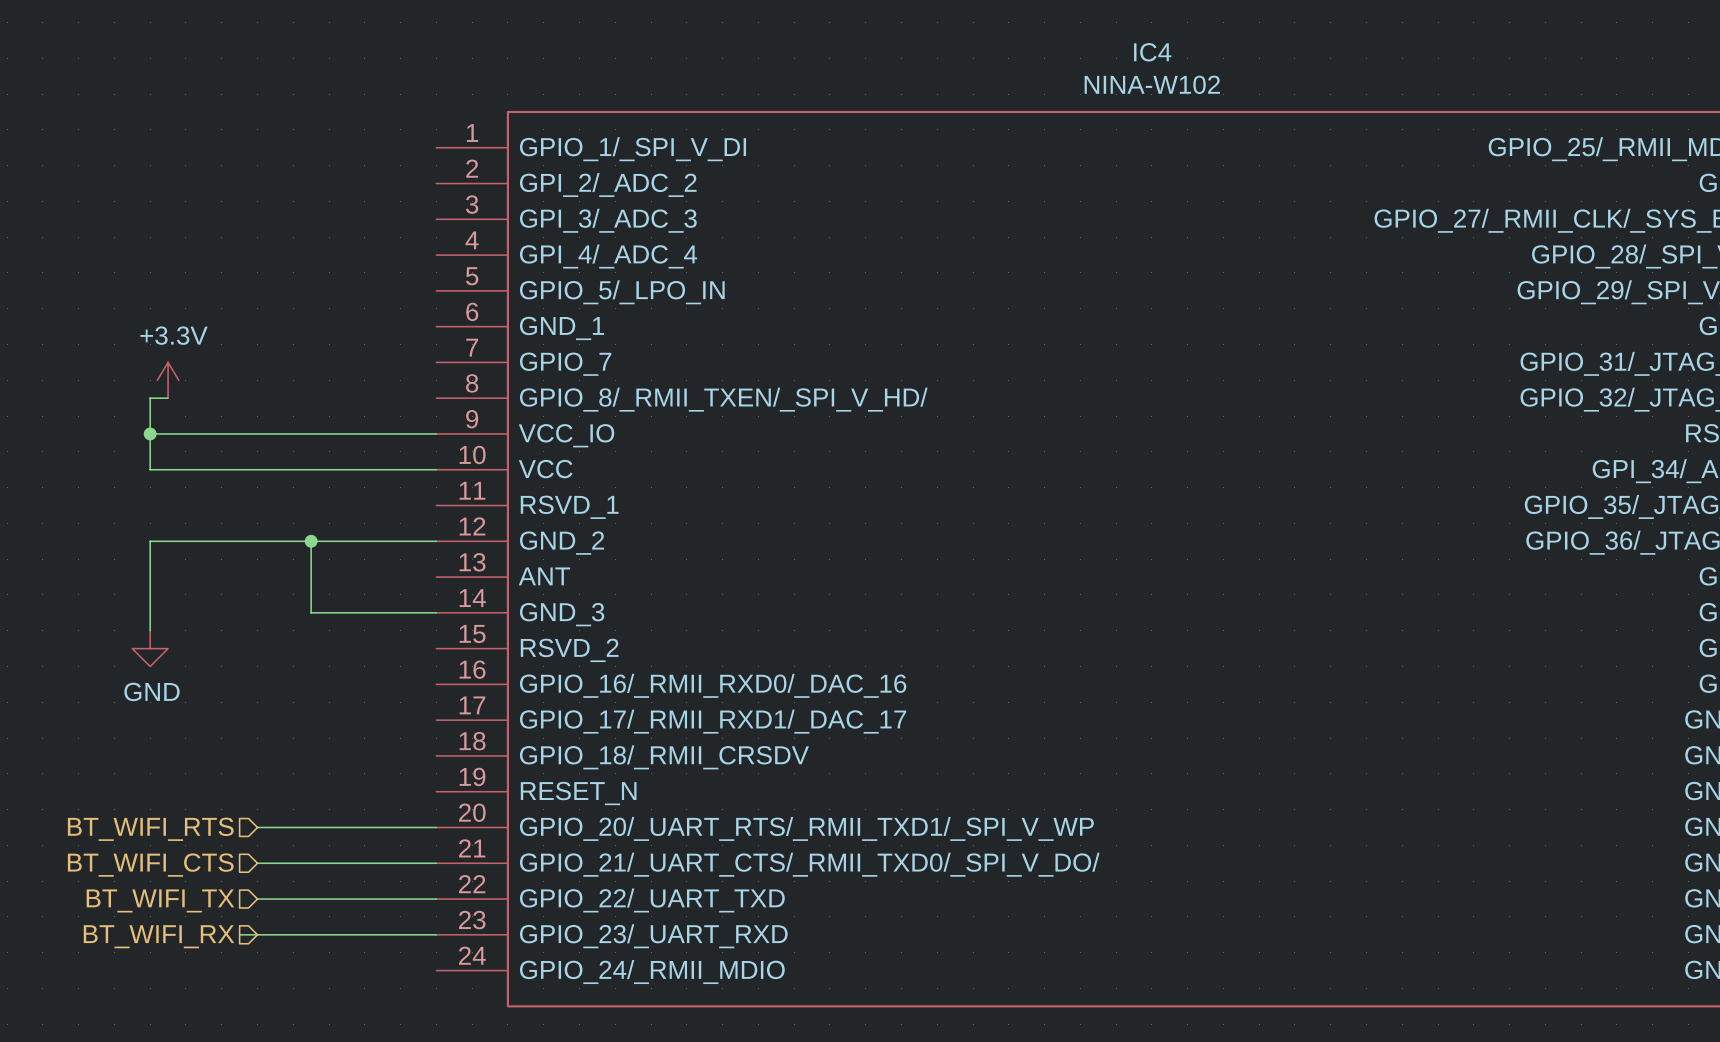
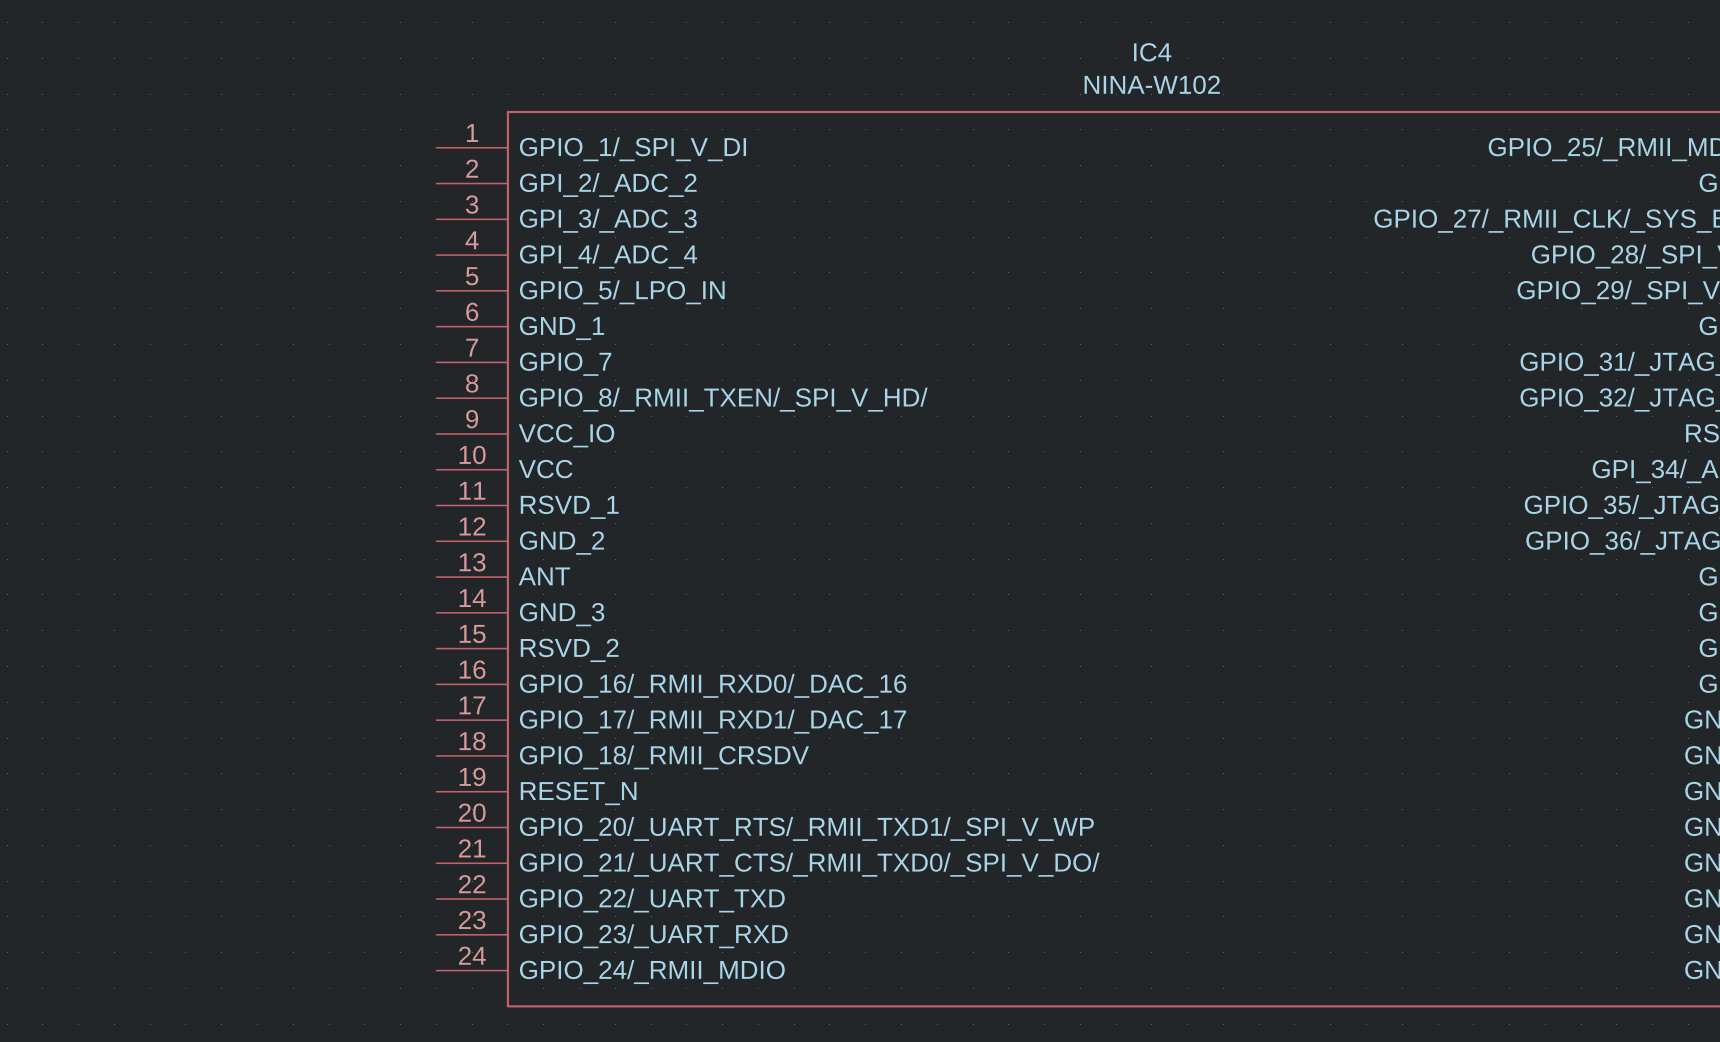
power symbol: +3.3V (168, 380) -> none
wire: (168, 398) (150, 398) (150, 469) (436, 469) -> none
wire: (150, 433) (436, 433) -> none
junction: (150, 433) -> none
wire: (311, 541) (311, 612) (436, 612) -> none
junction: (311, 541) -> none
wire: (436, 541) (150, 541) (150, 630) -> none
power symbol: GND (150, 648) -> none
wire: (257, 827) (436, 827) -> none
hierarchical label: BT_WIFI_RTS (150, 829) -> none
wire: (257, 863) (436, 863) -> none
hierarchical label: BT_WIFI_CTS (150, 865) -> none
wire: (257, 899) (436, 899) -> none
hierarchical label: BT_WIFI_TX (160, 900) -> none
wire: (239, 934) (436, 934) -> none
hierarchical label: BT_WIFI_RX (159, 936) -> none

